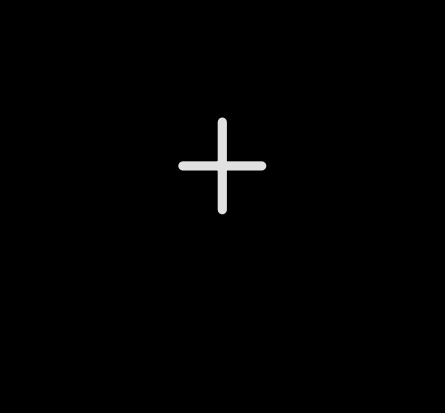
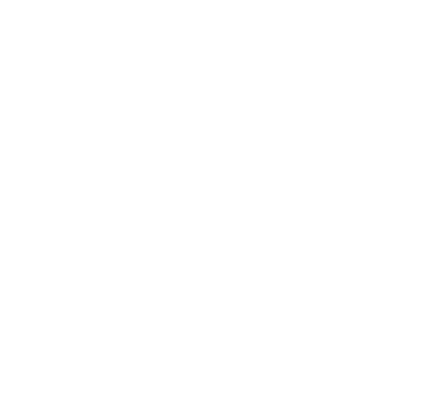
text: + (222, 165) -> none

